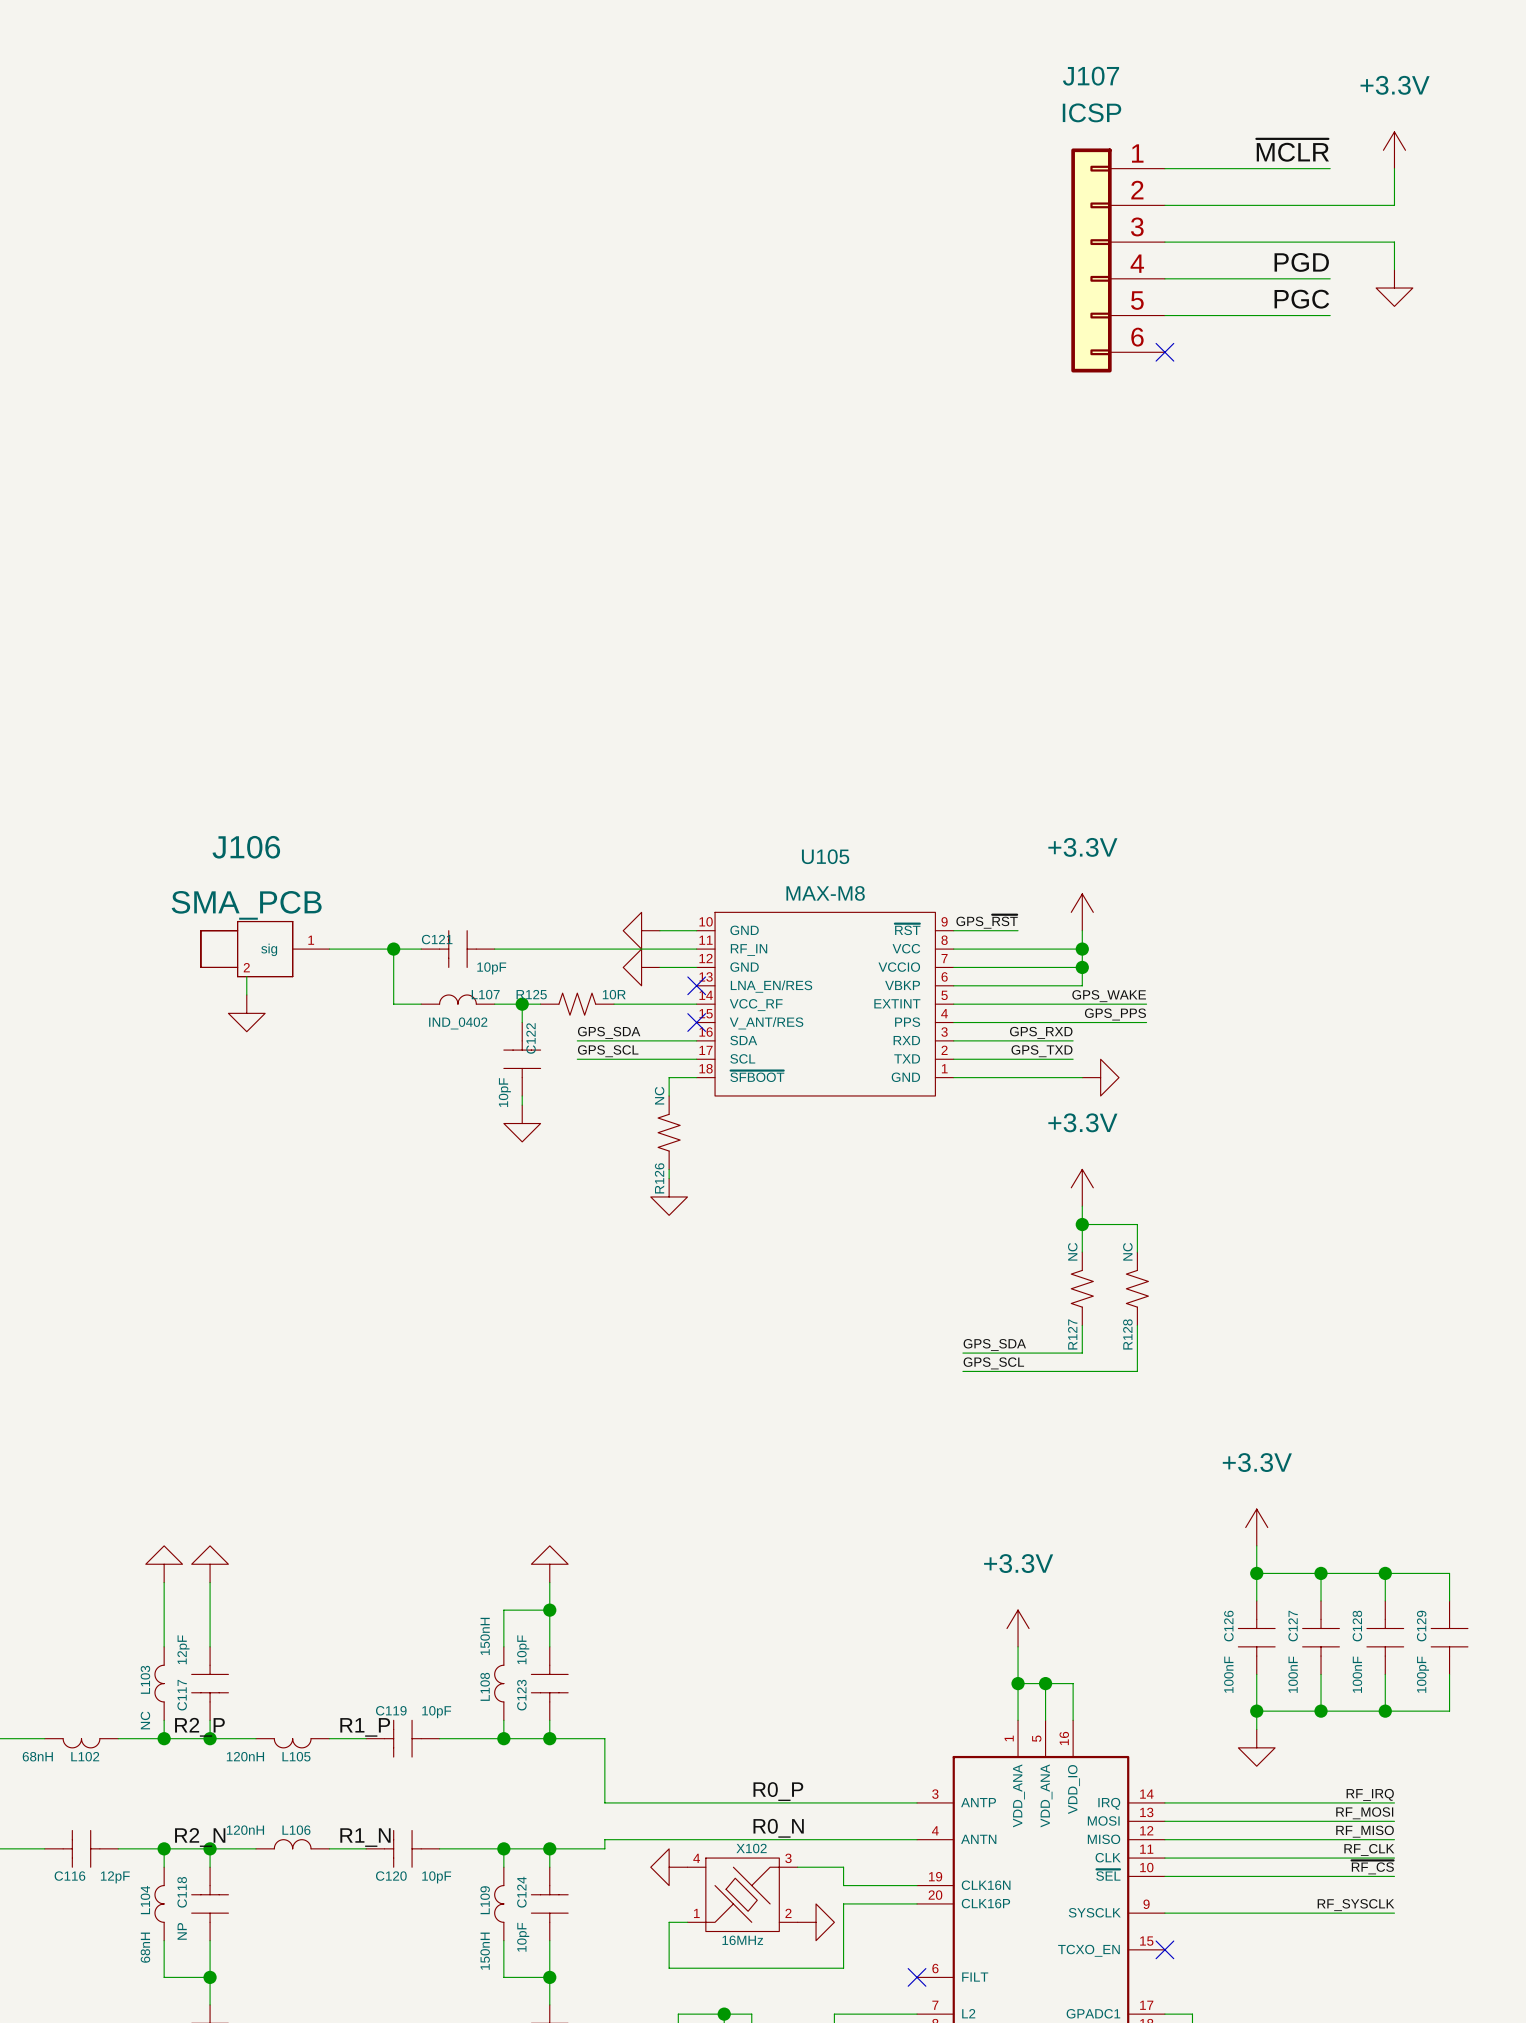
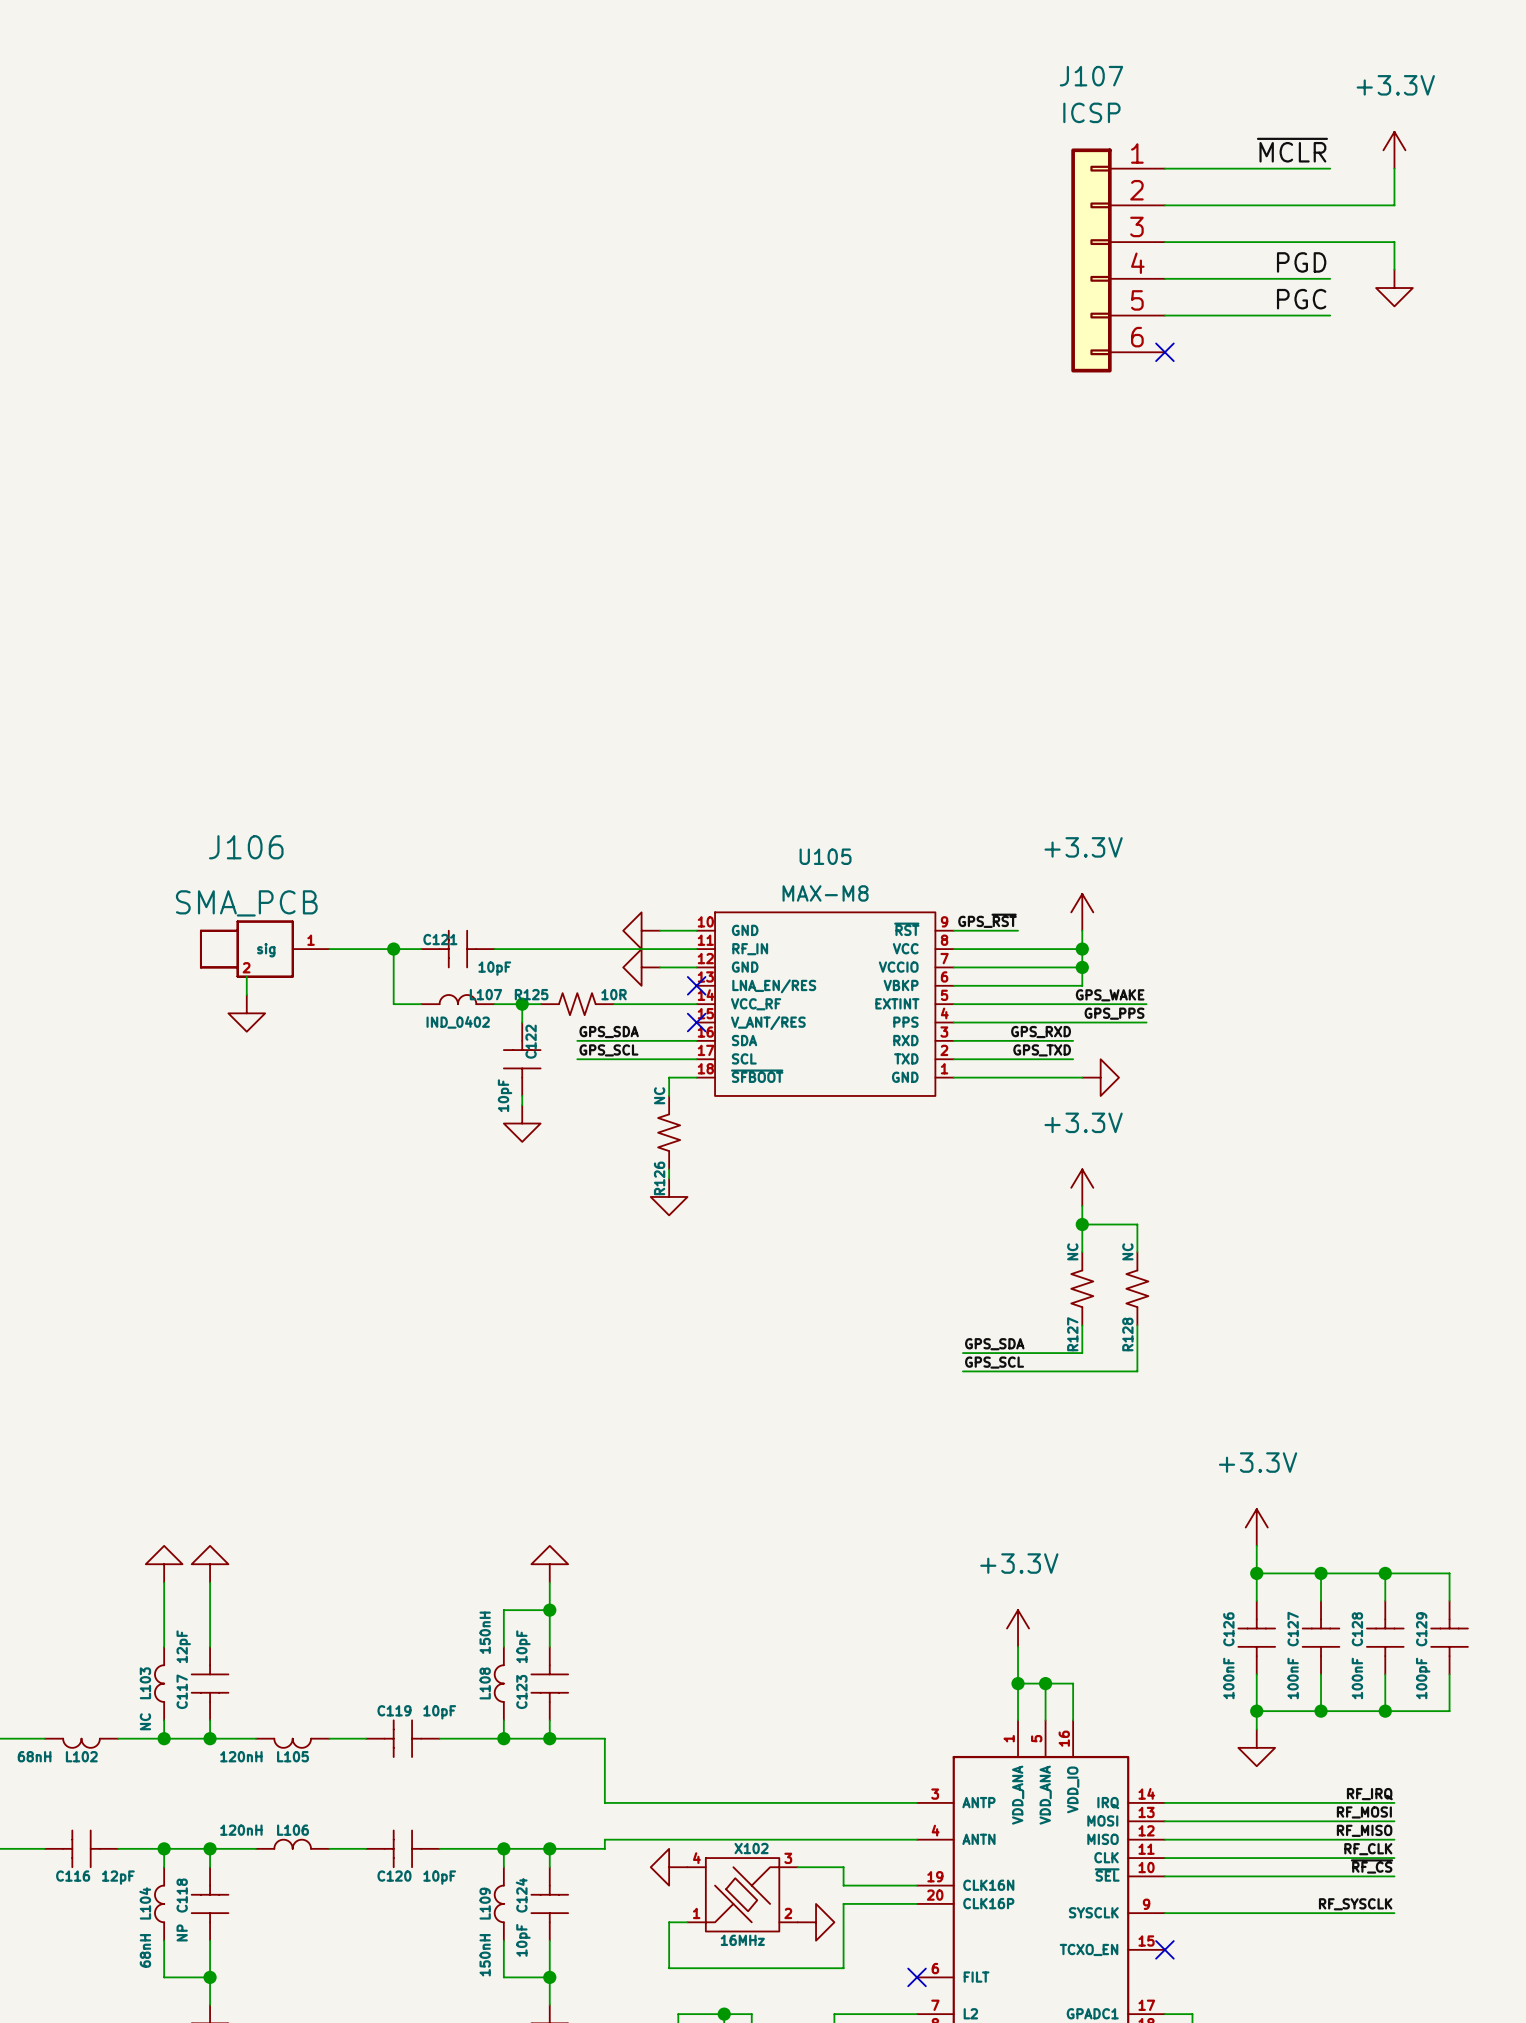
label: R2_P (199, 1727) -> none
label: R1_P (365, 1727) -> none
label: R0_P (778, 1791) -> none
label: R0_N (778, 1828) -> none
label: R2_N (200, 1837) -> none
label: R1_N (365, 1837) -> none

